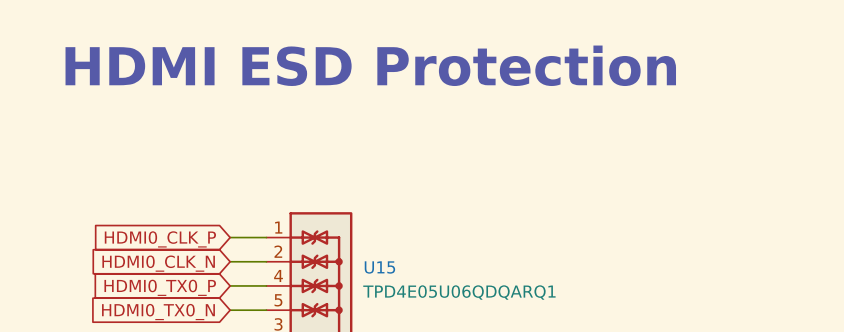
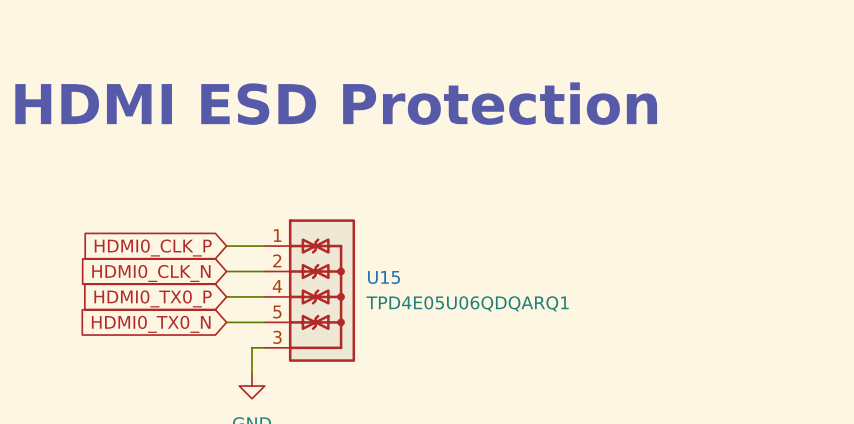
text position: HDMI ESD Protection (370, 65) -> HDMI ESD Protection (336, 103)

